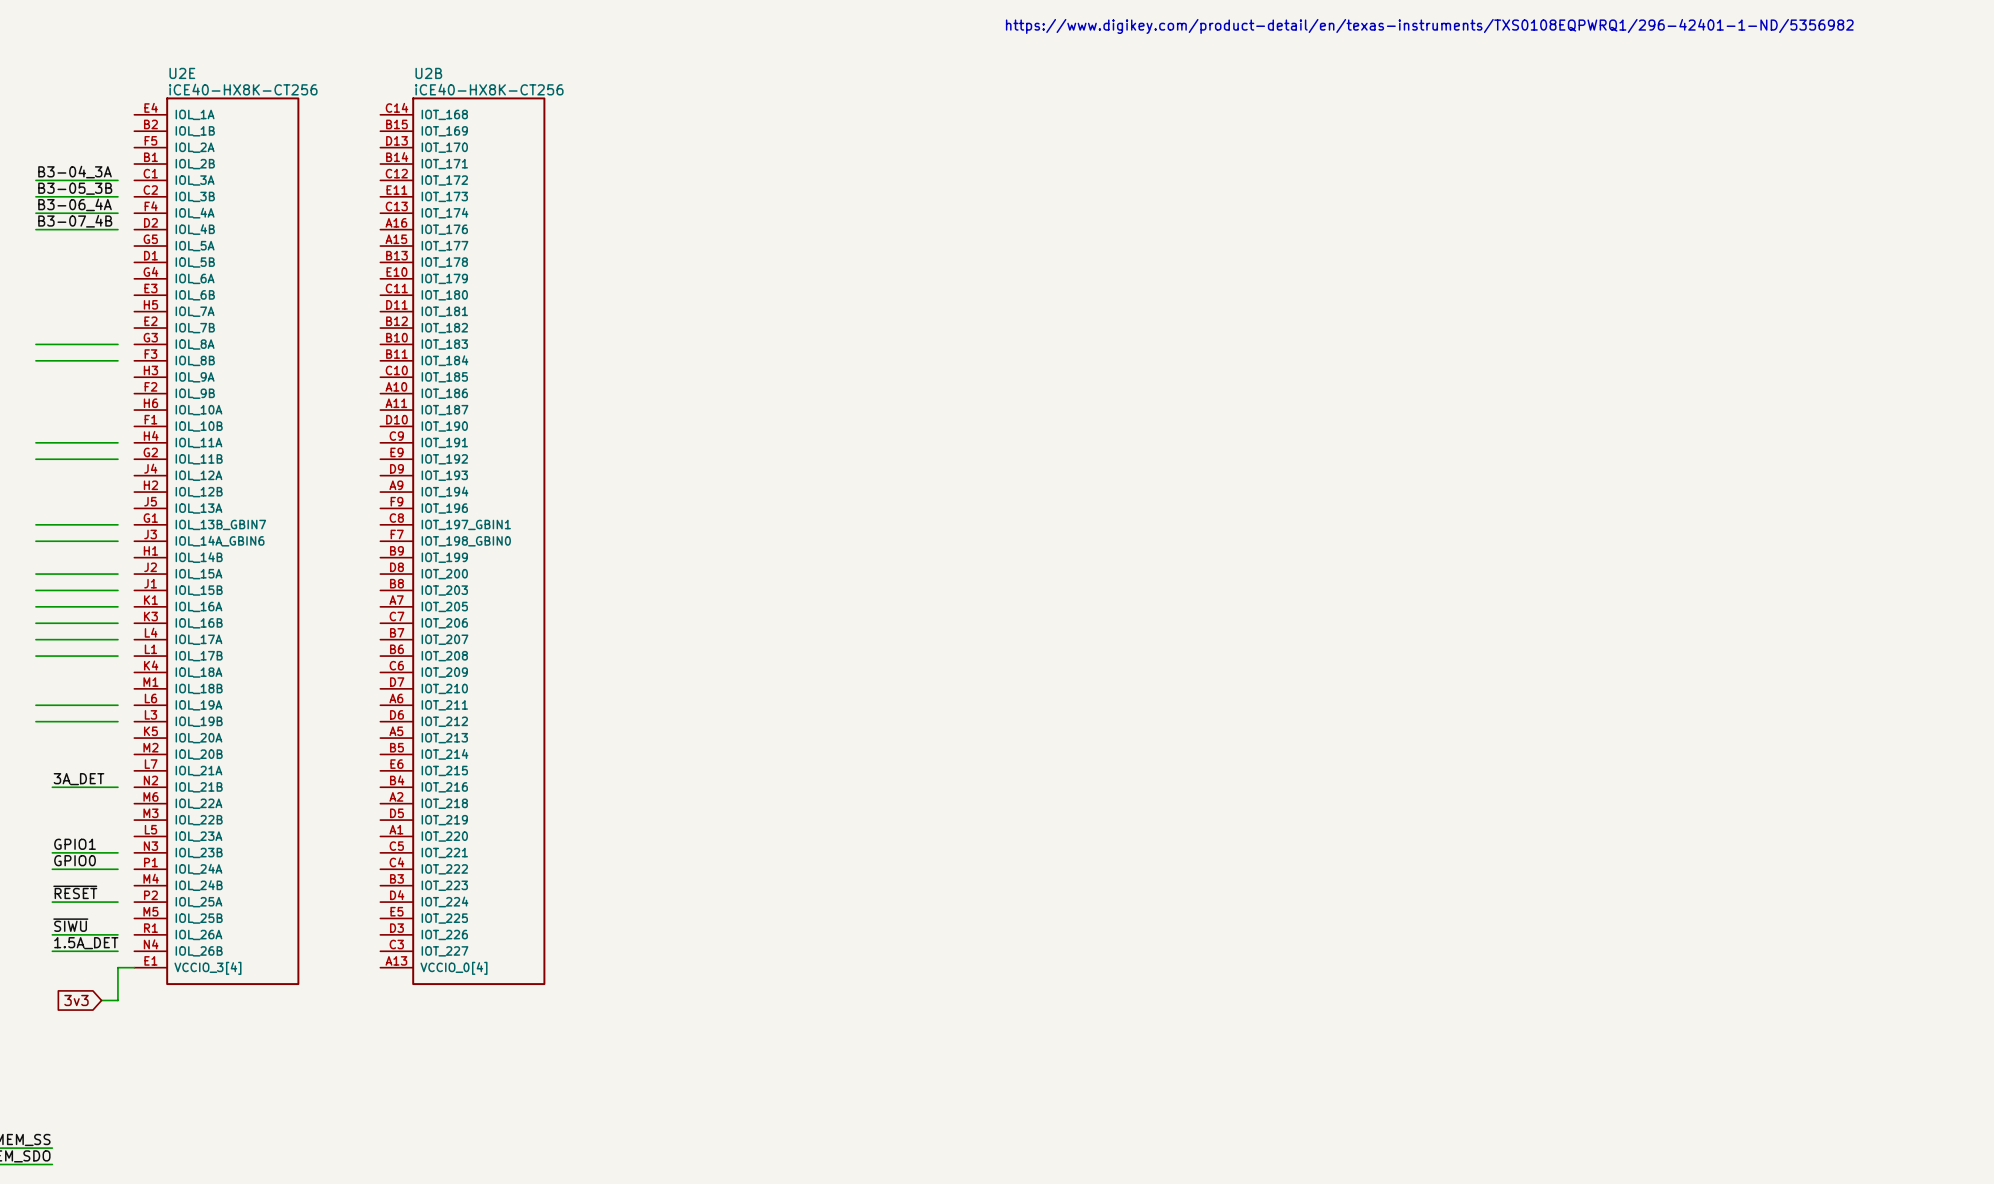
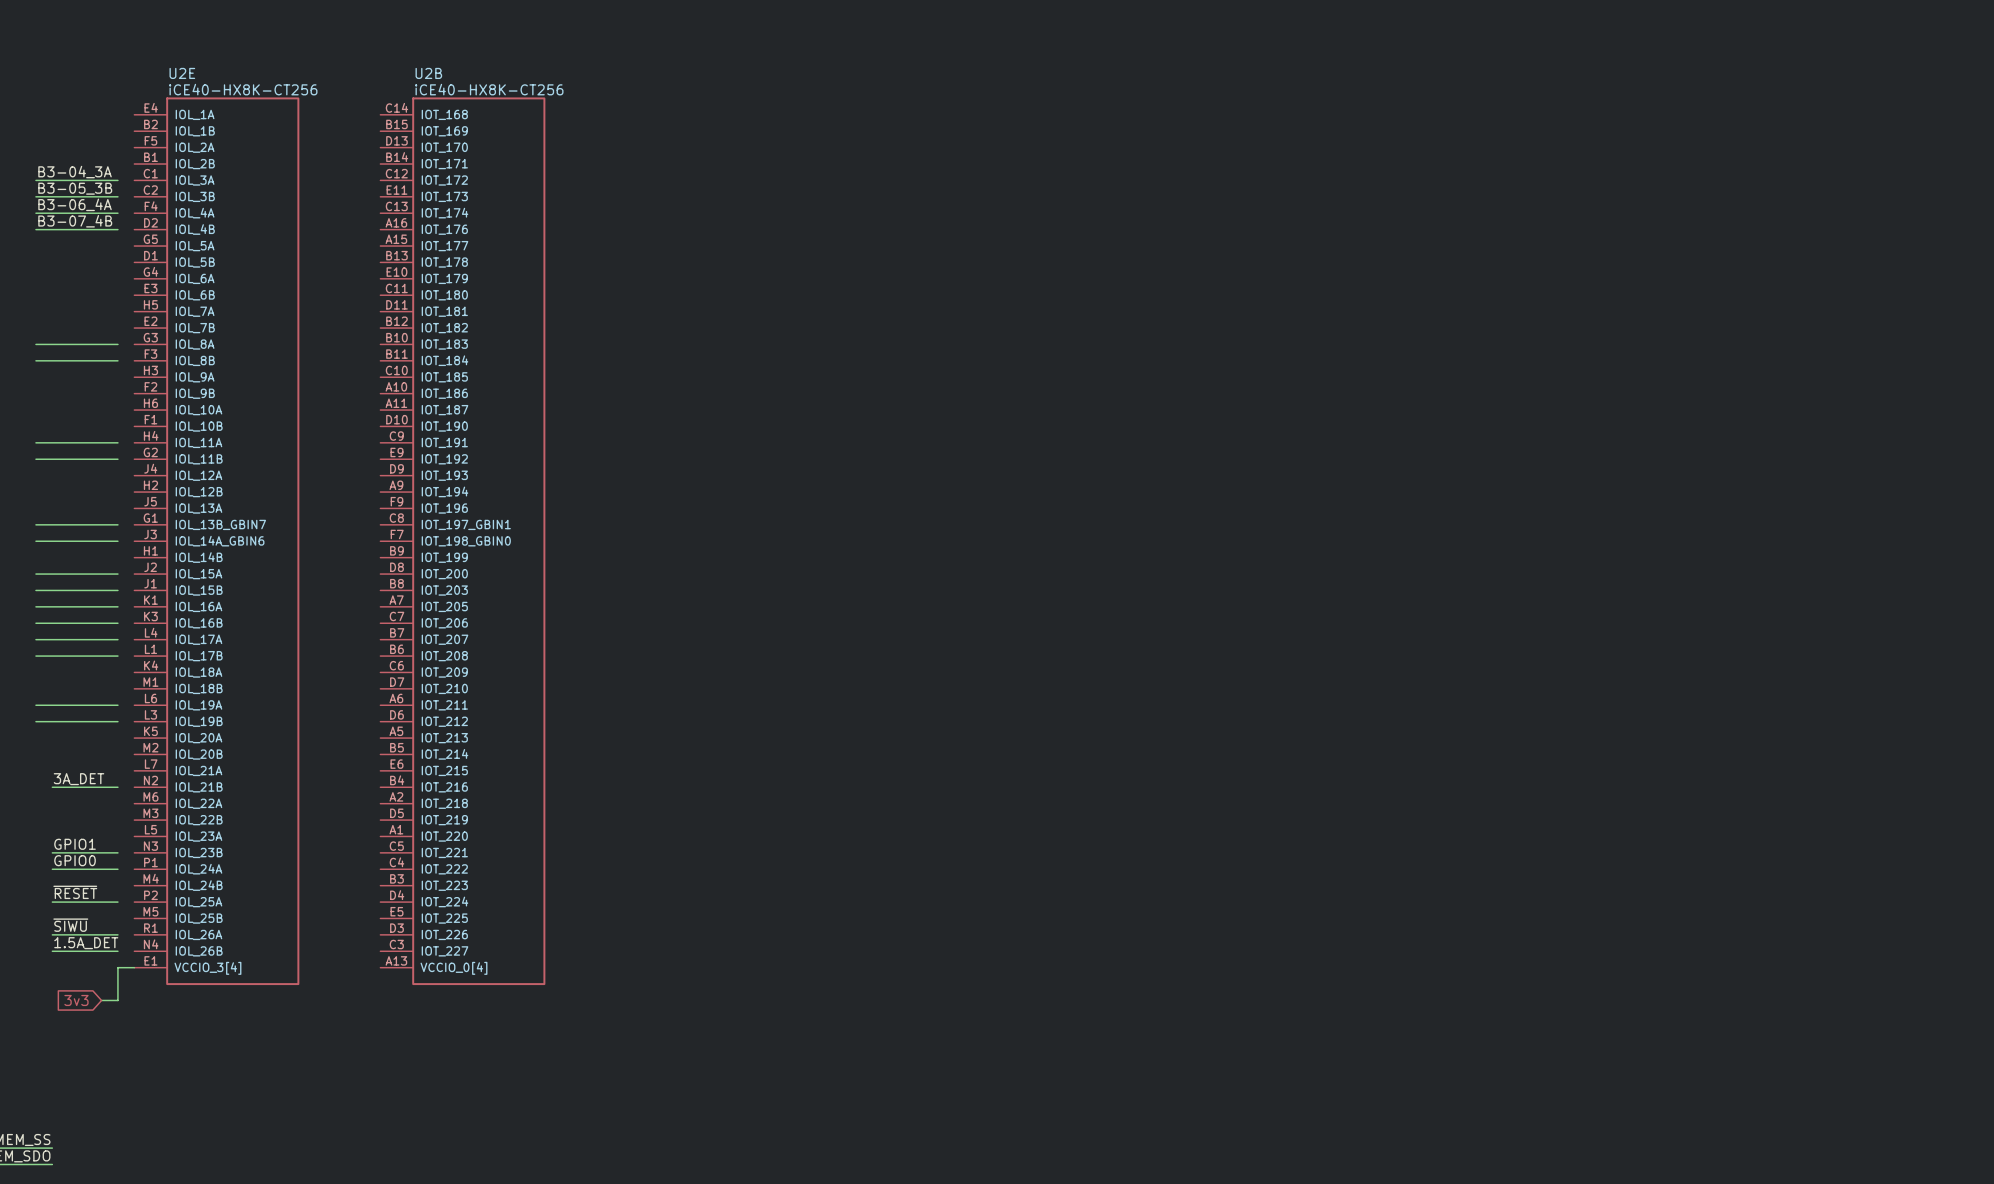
text: https://www.digikey.com/product-detail/en/texas-instruments/TXS0108EQPWRQ1/296-42401-1-ND/5356982 (1429, 26) -> none

